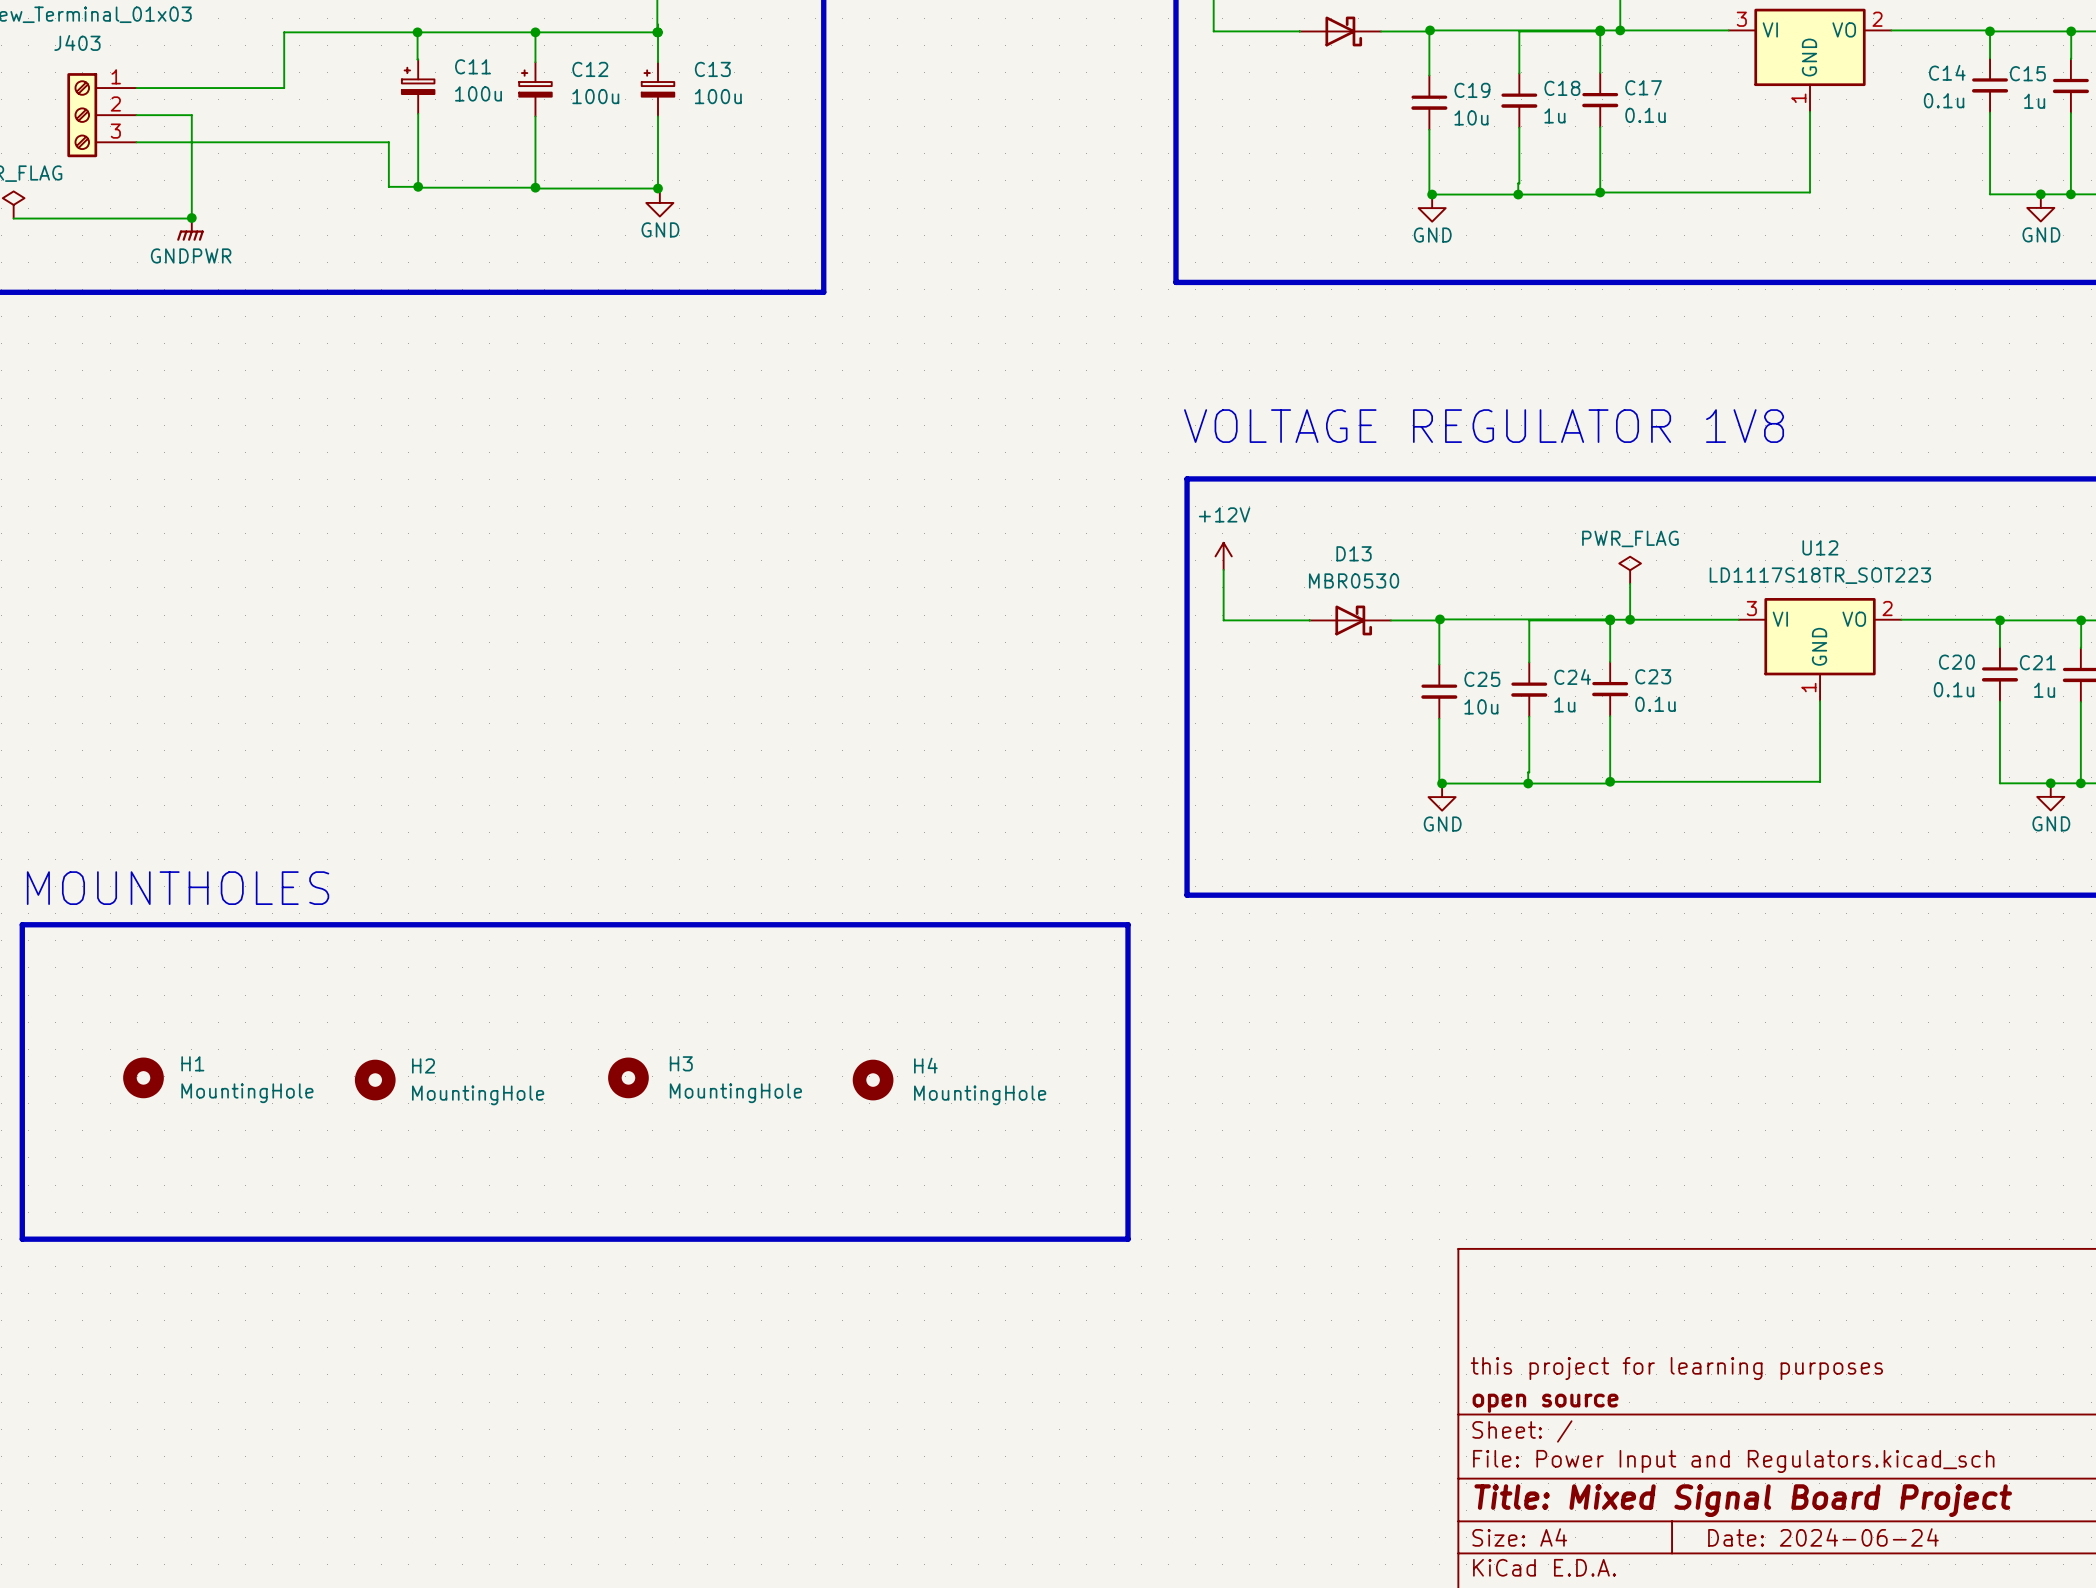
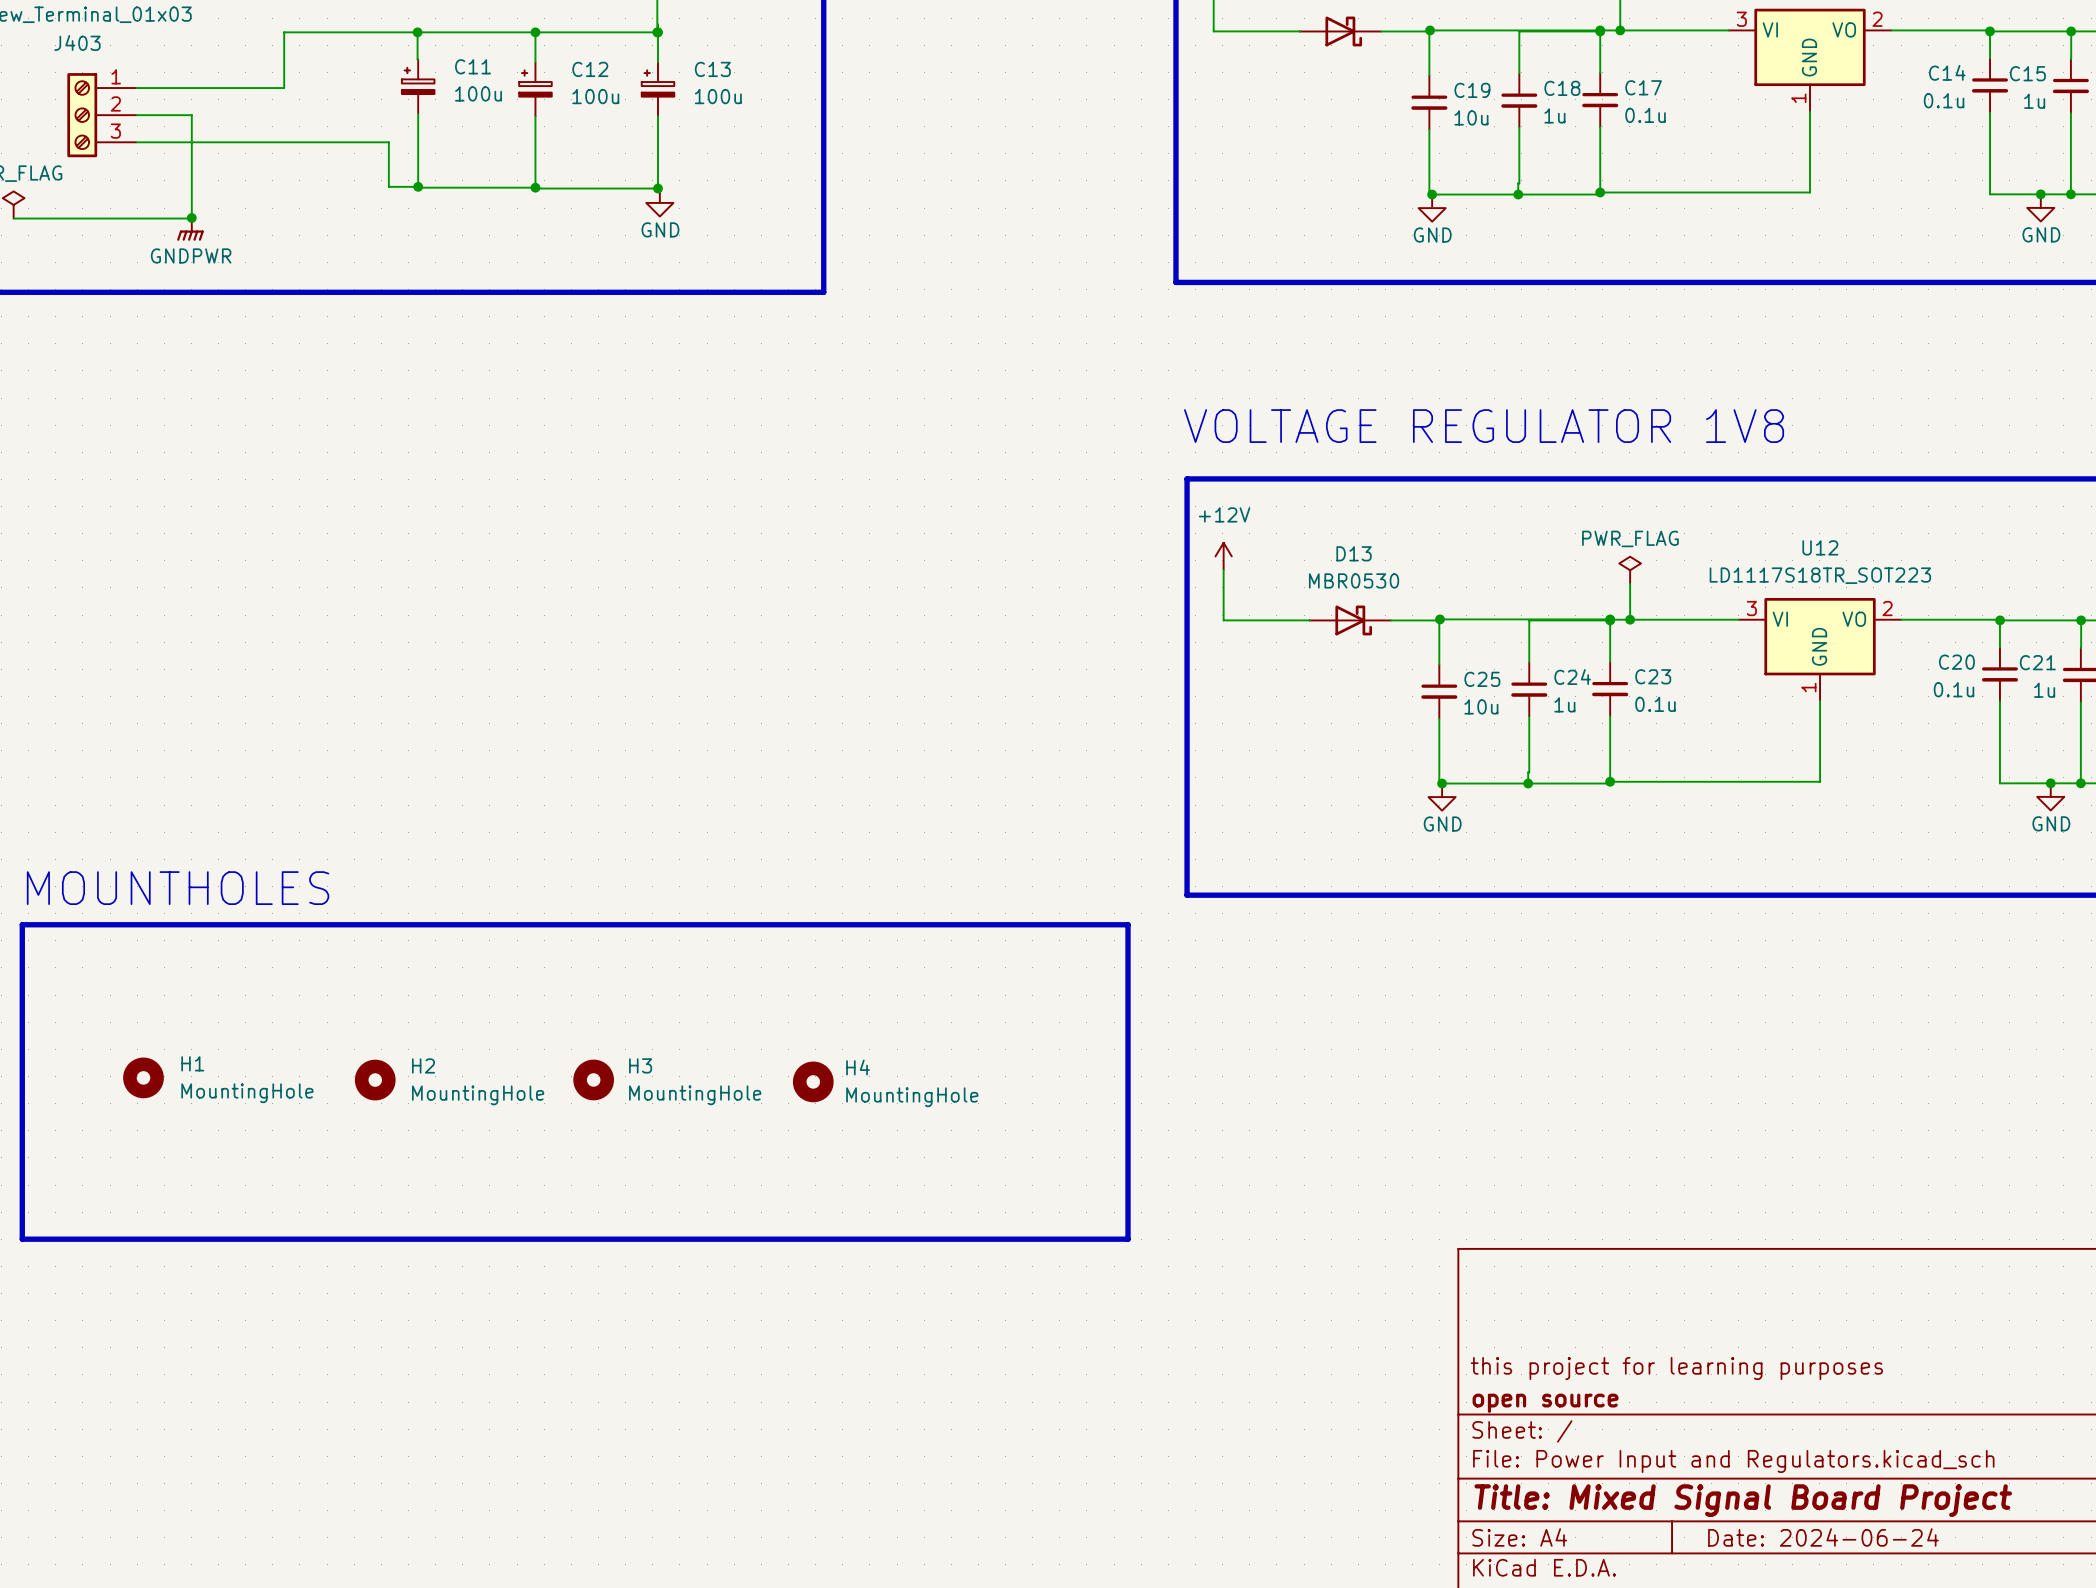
H3 name position: H3 (681, 1063) -> H3 (640, 1065)
H4 name position: H4 (925, 1065) -> H4 (858, 1067)
H3 position: (628, 1077) -> (593, 1079)
H4 position: (873, 1080) -> (813, 1081)
H3 value position: MountingHole (735, 1093) -> MountingHole (695, 1095)
H4 value position: MountingHole (980, 1095) -> MountingHole (912, 1097)

